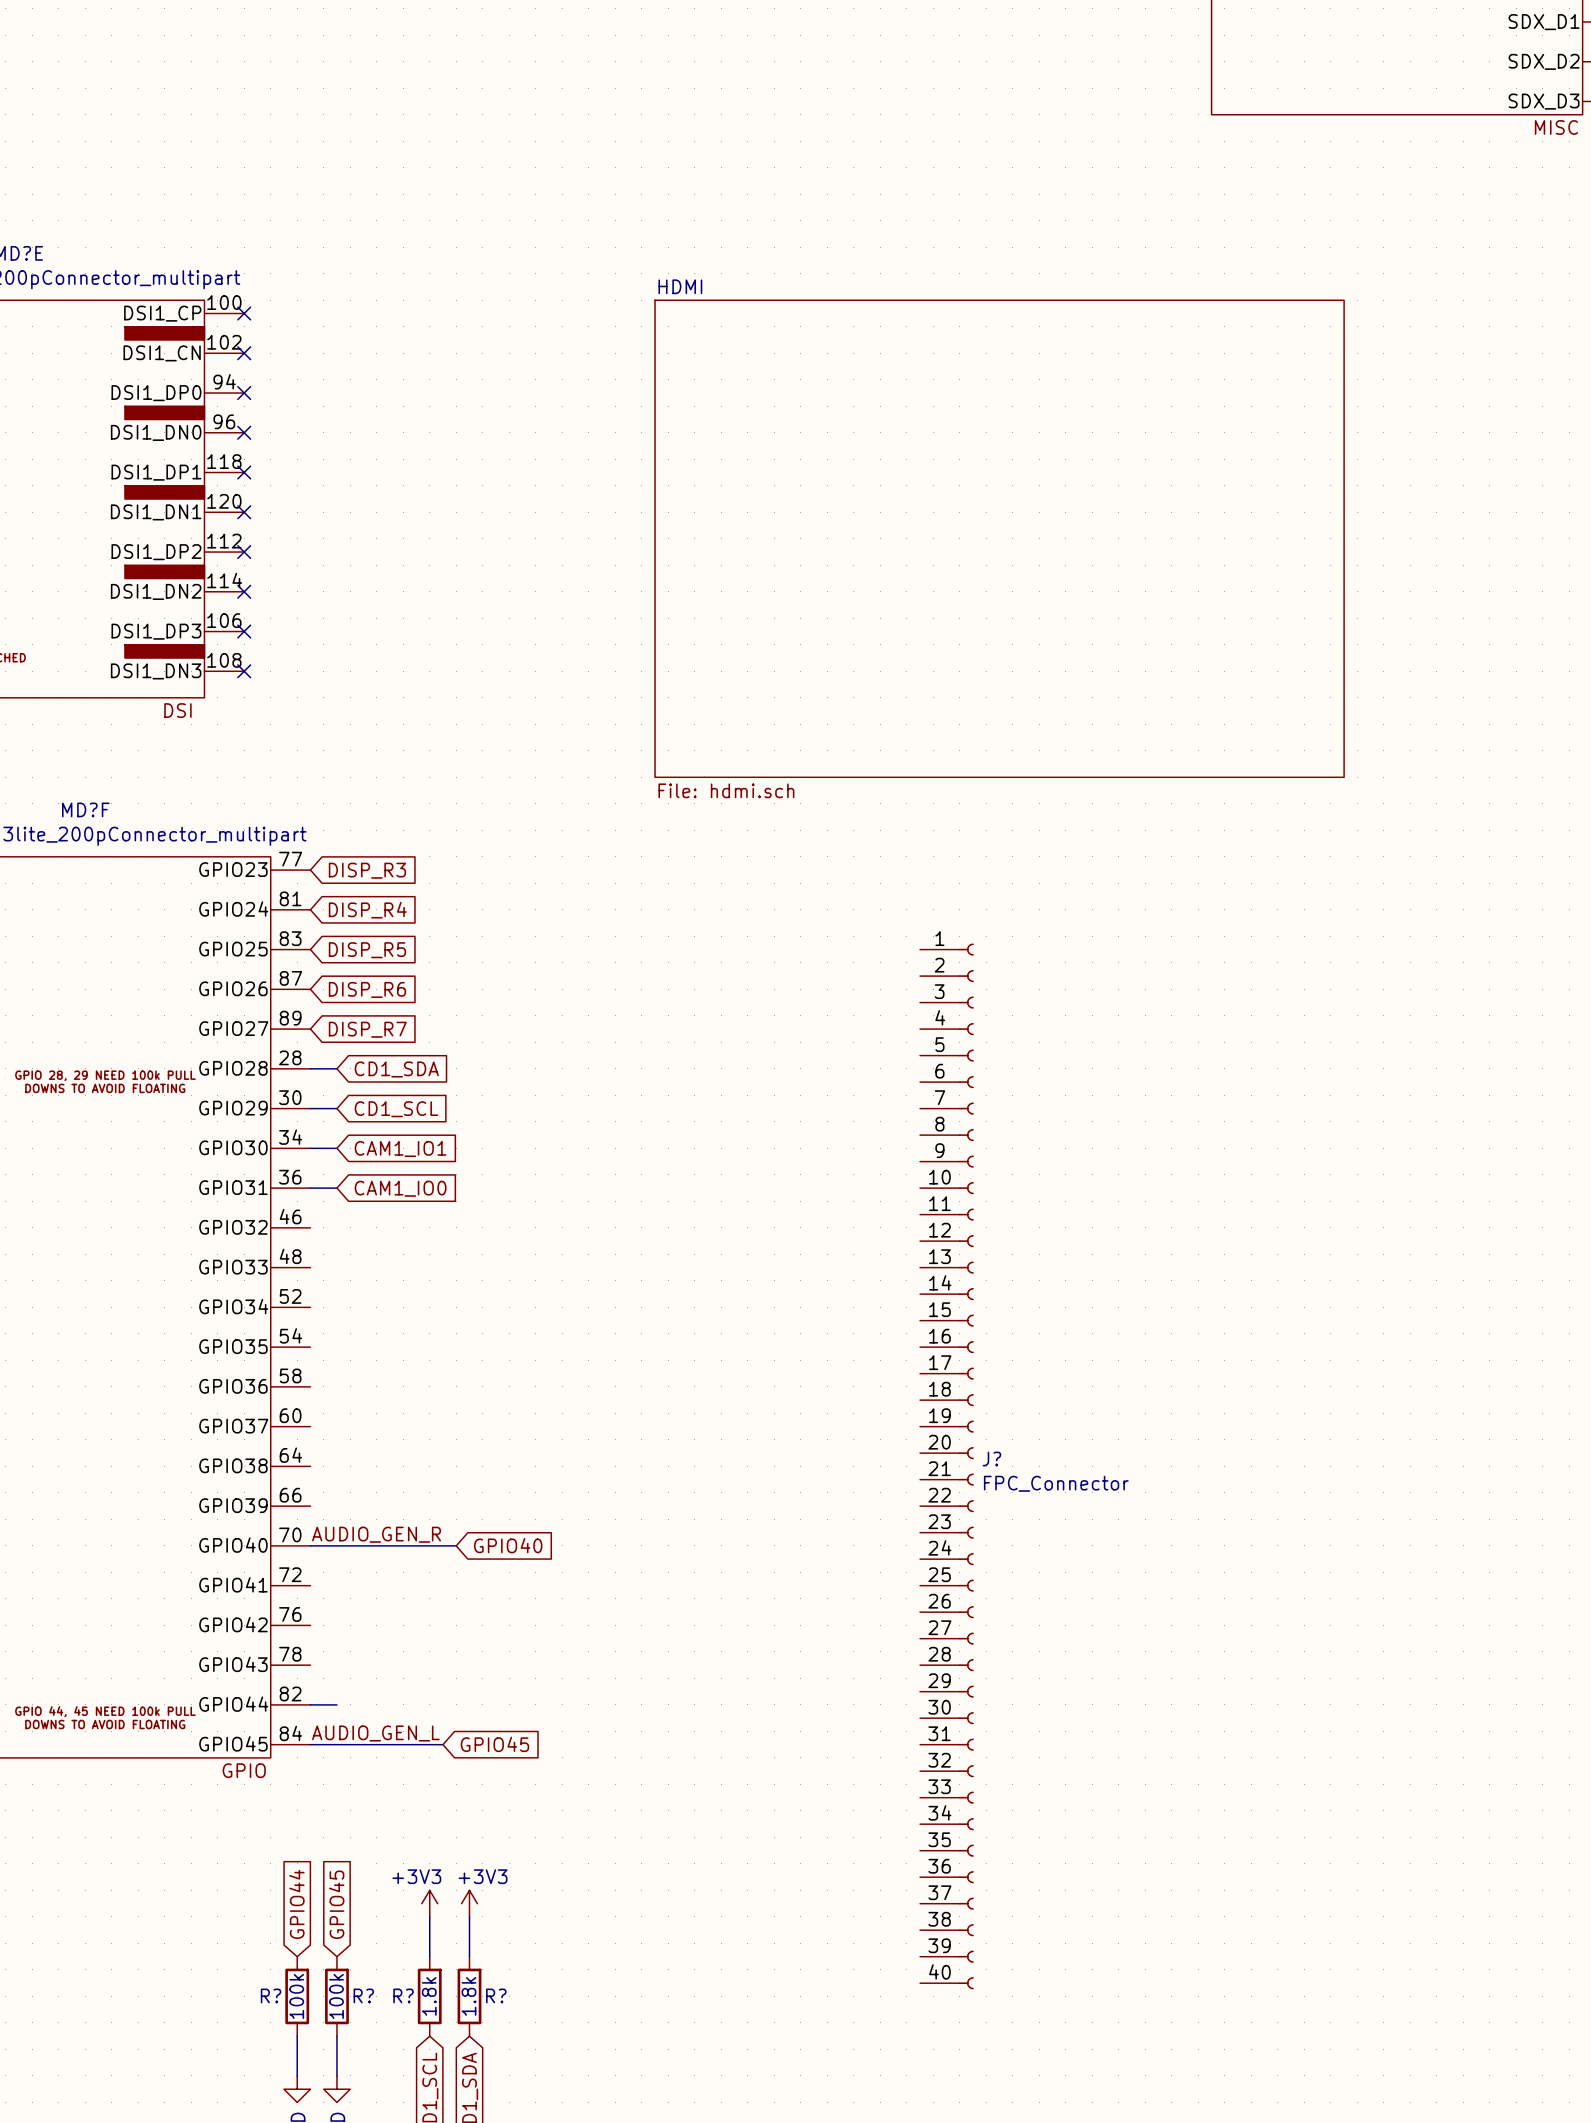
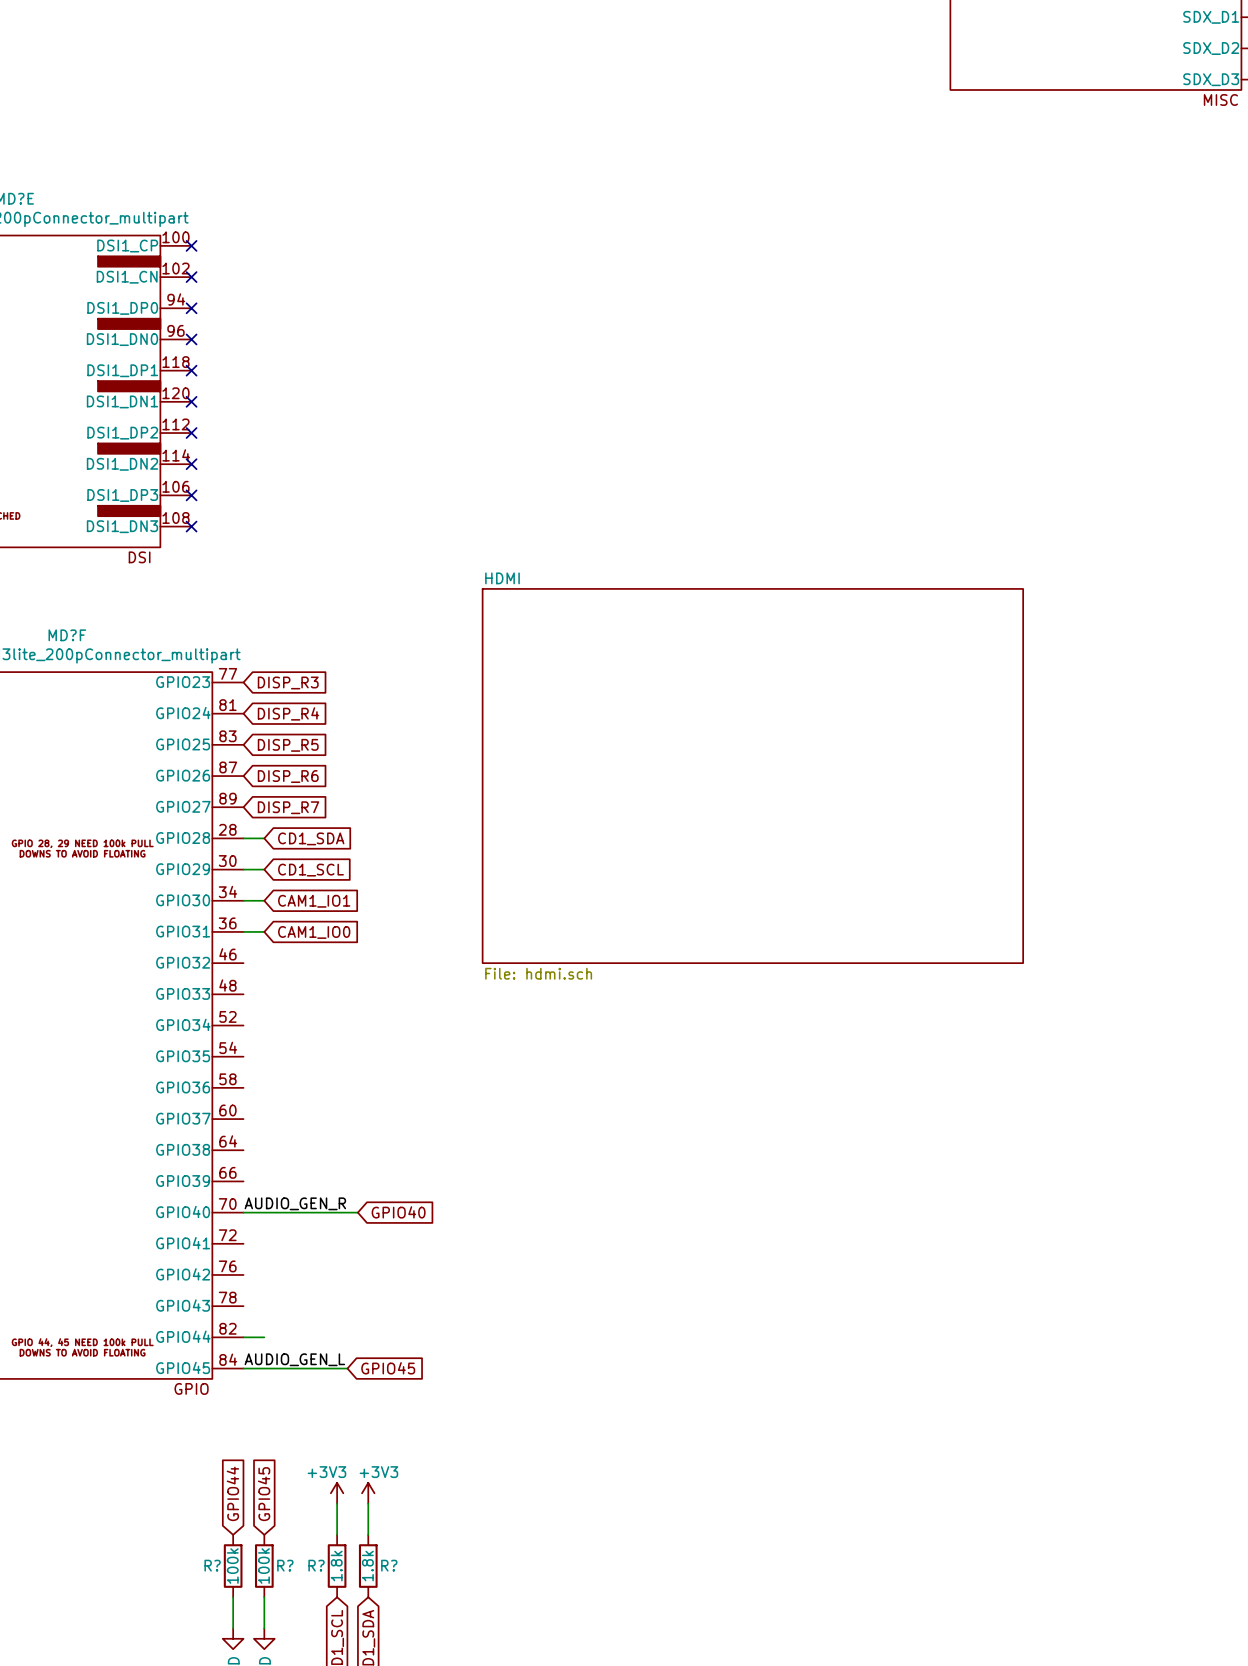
sheet HDMI: File: hdmi.sch (999, 538) -> none
sheet HDMI: none -> File: hdmi.sch (752, 776)
J?: FPC_Connector (946, 1466) -> none

